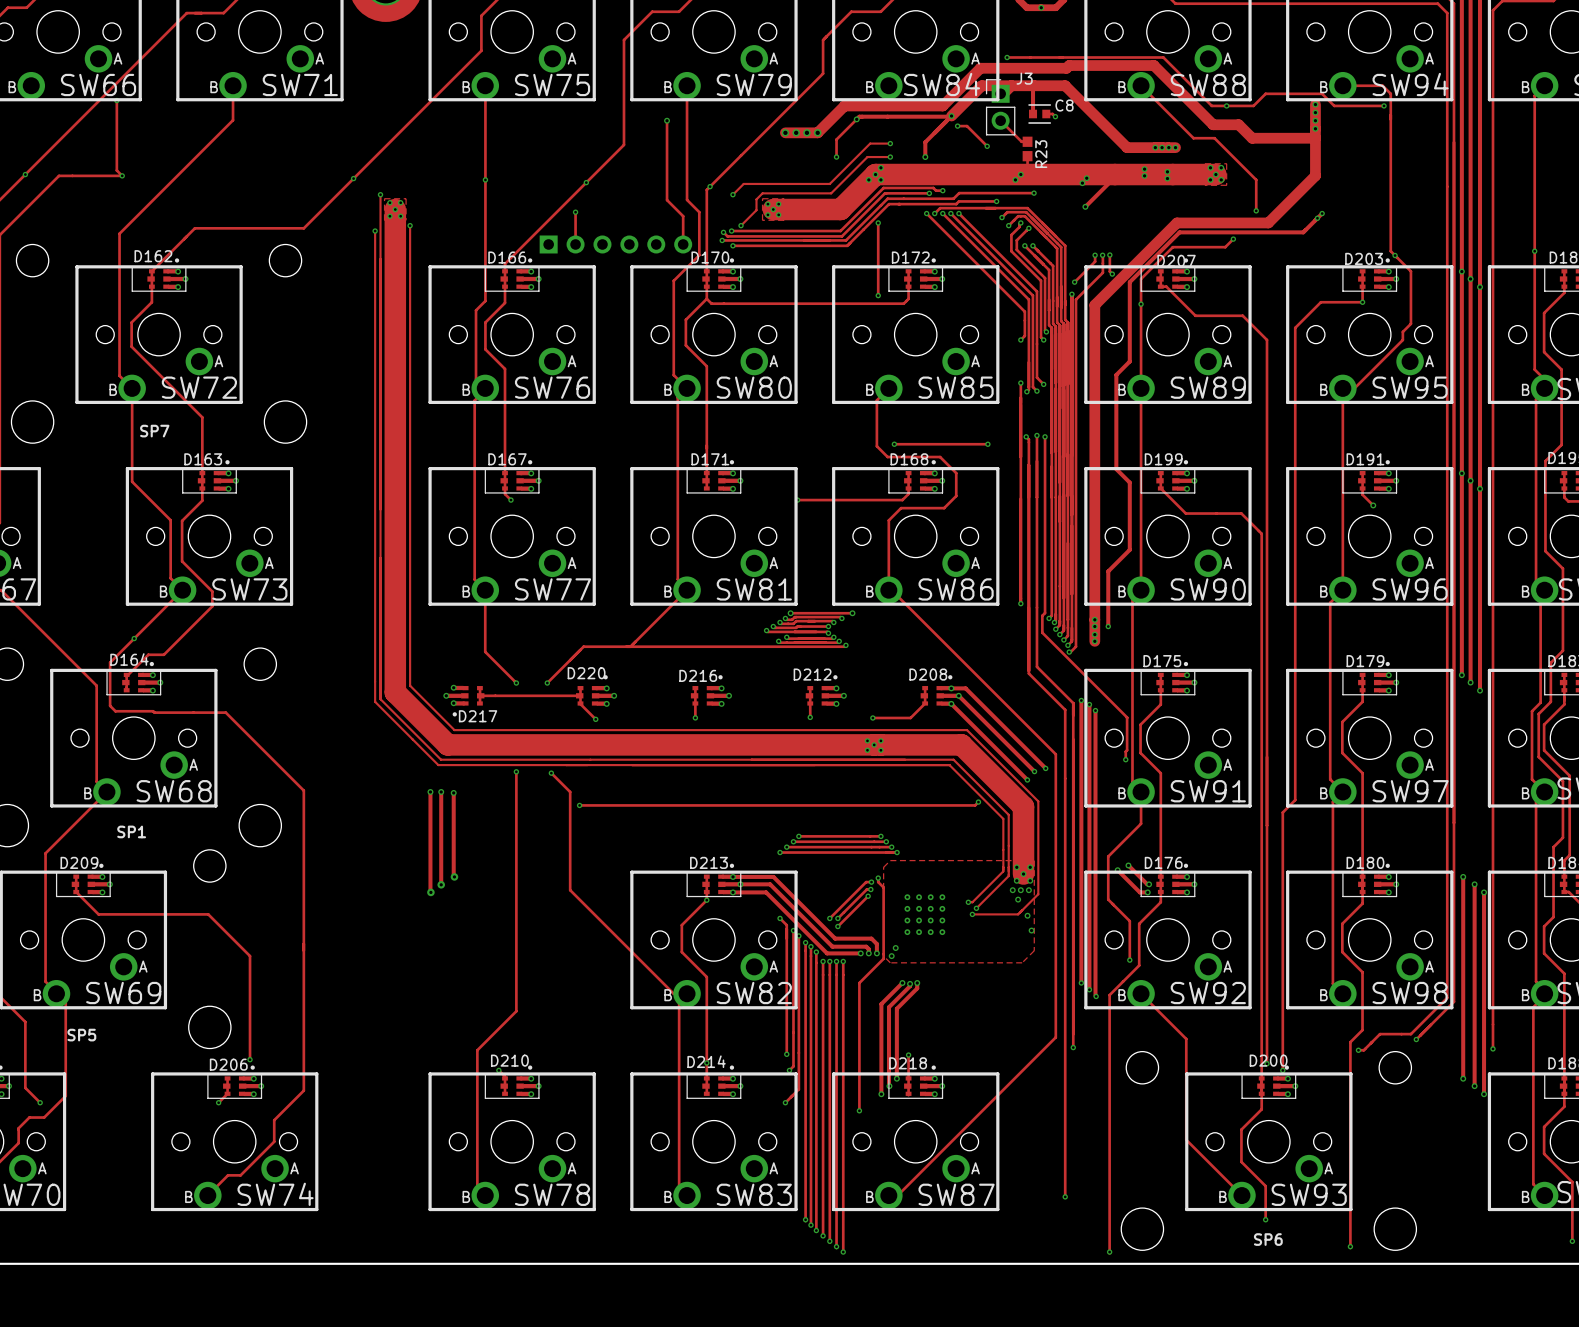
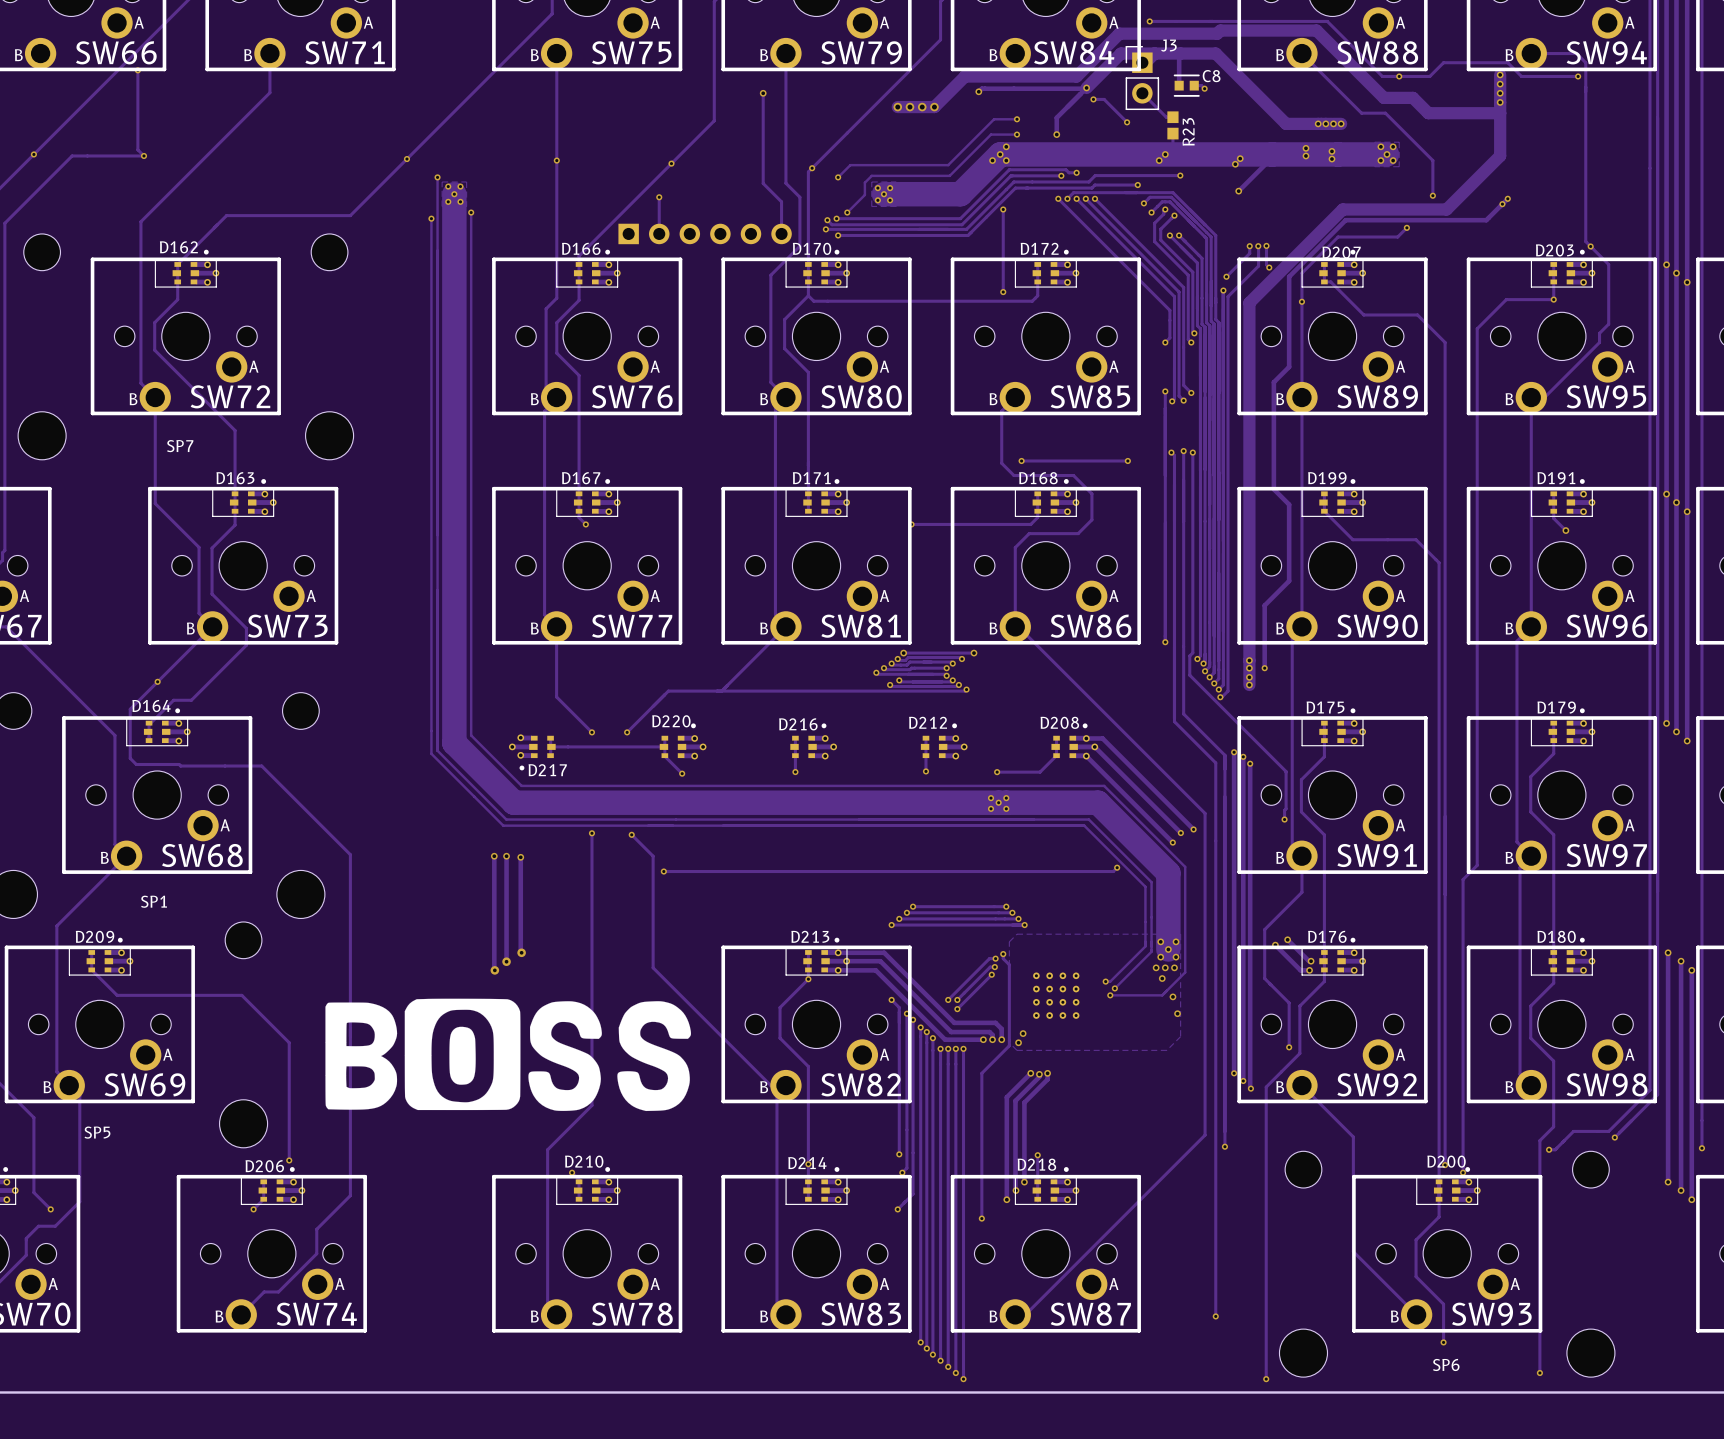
track: (856, 119) (836, 139) (836, 157) -> none
via: (836, 157) -> none
drawing: none -> [325, 998, 692, 1112]

